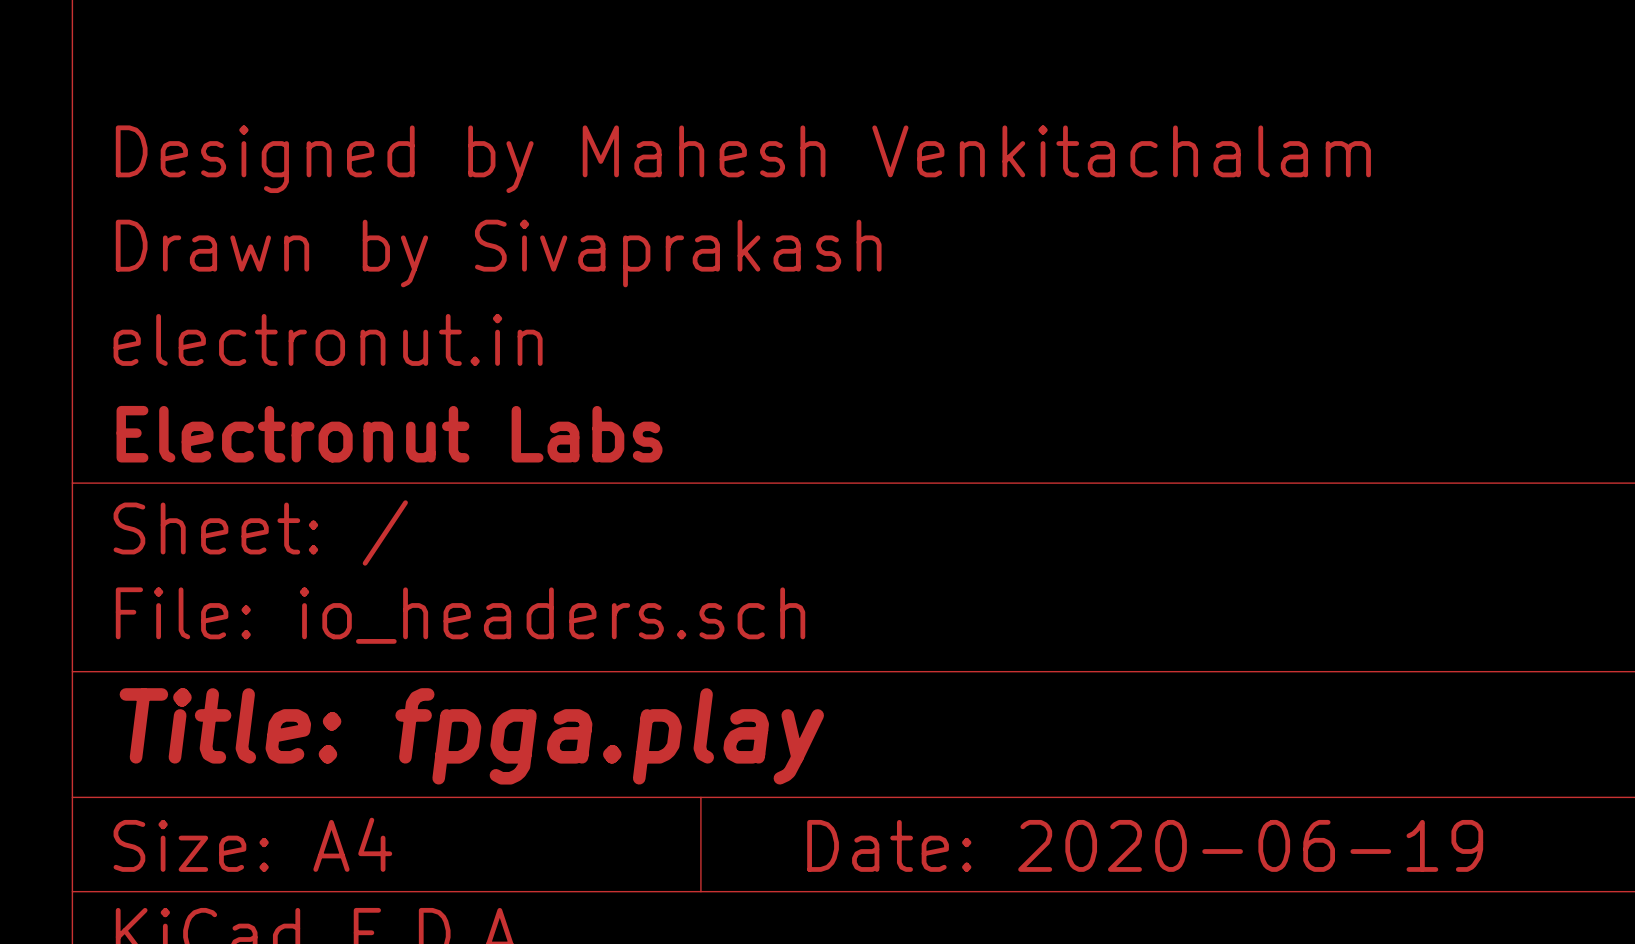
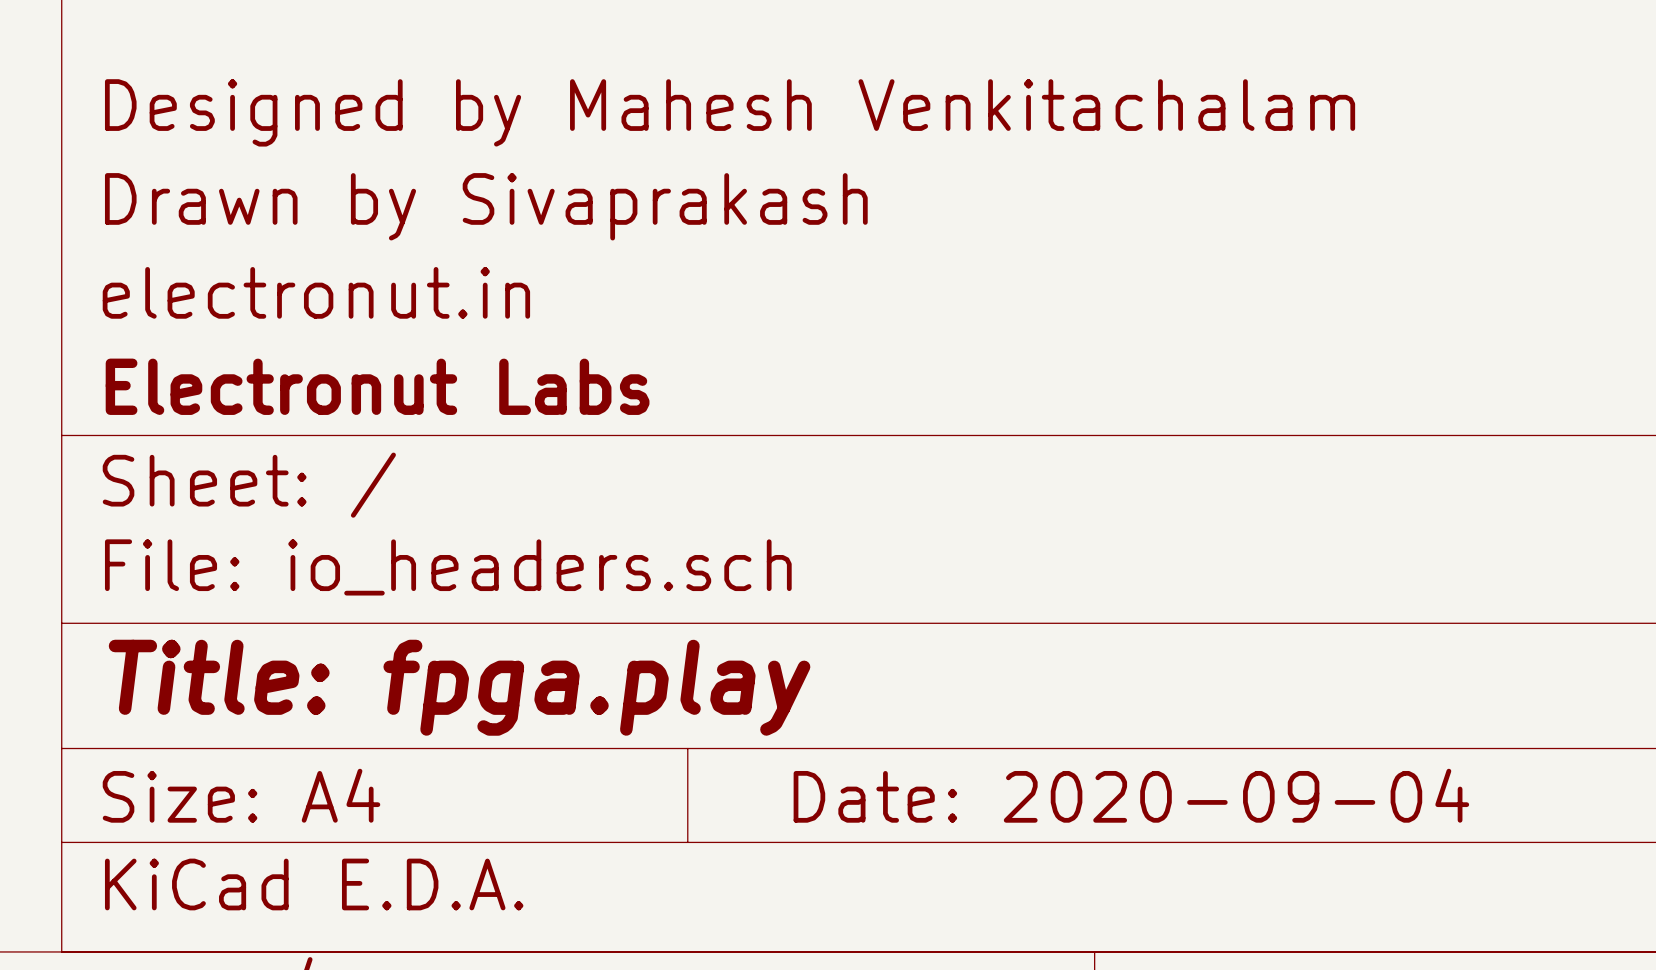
title block: Date: 2020-06-19 (1145, 845) -> Date: 2020-09-04 (1131, 795)

